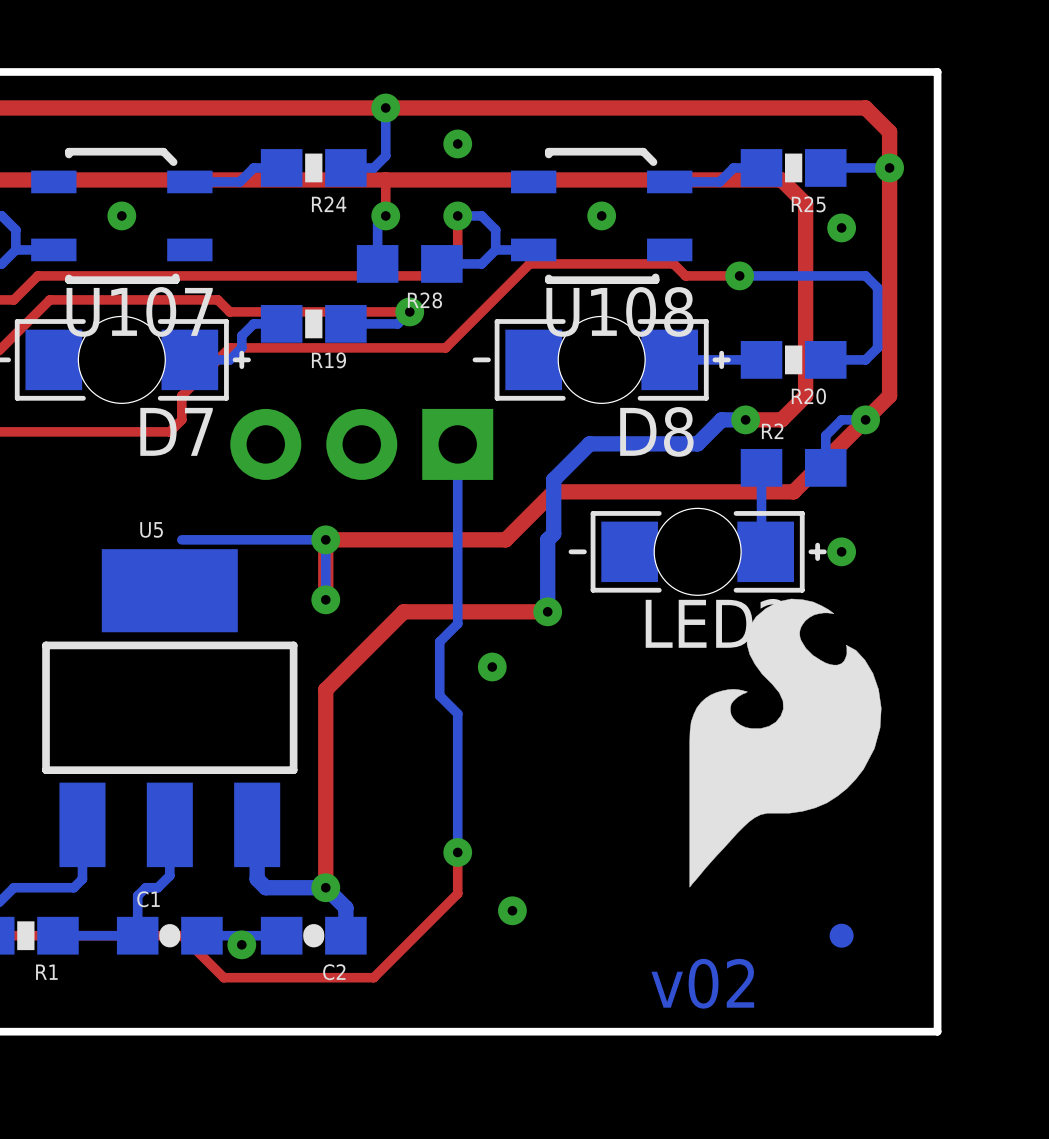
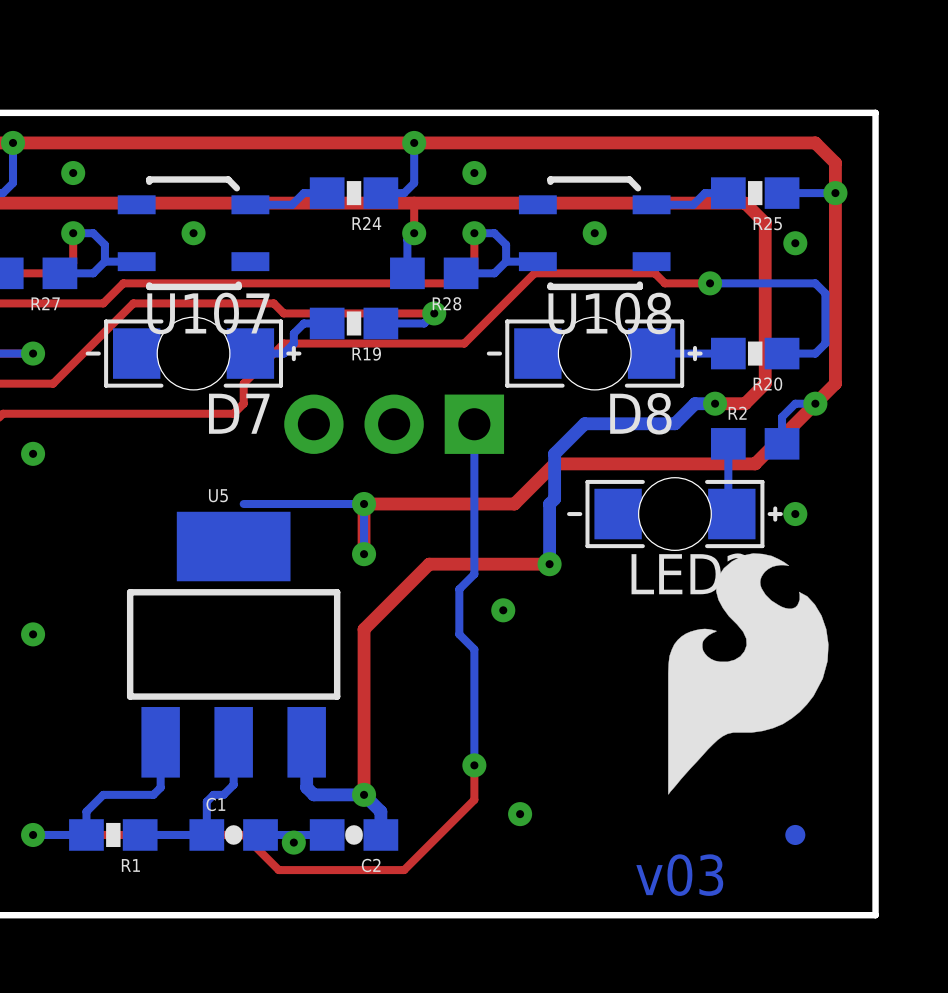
text: v02 (702, 983) -> v03 (679, 875)

